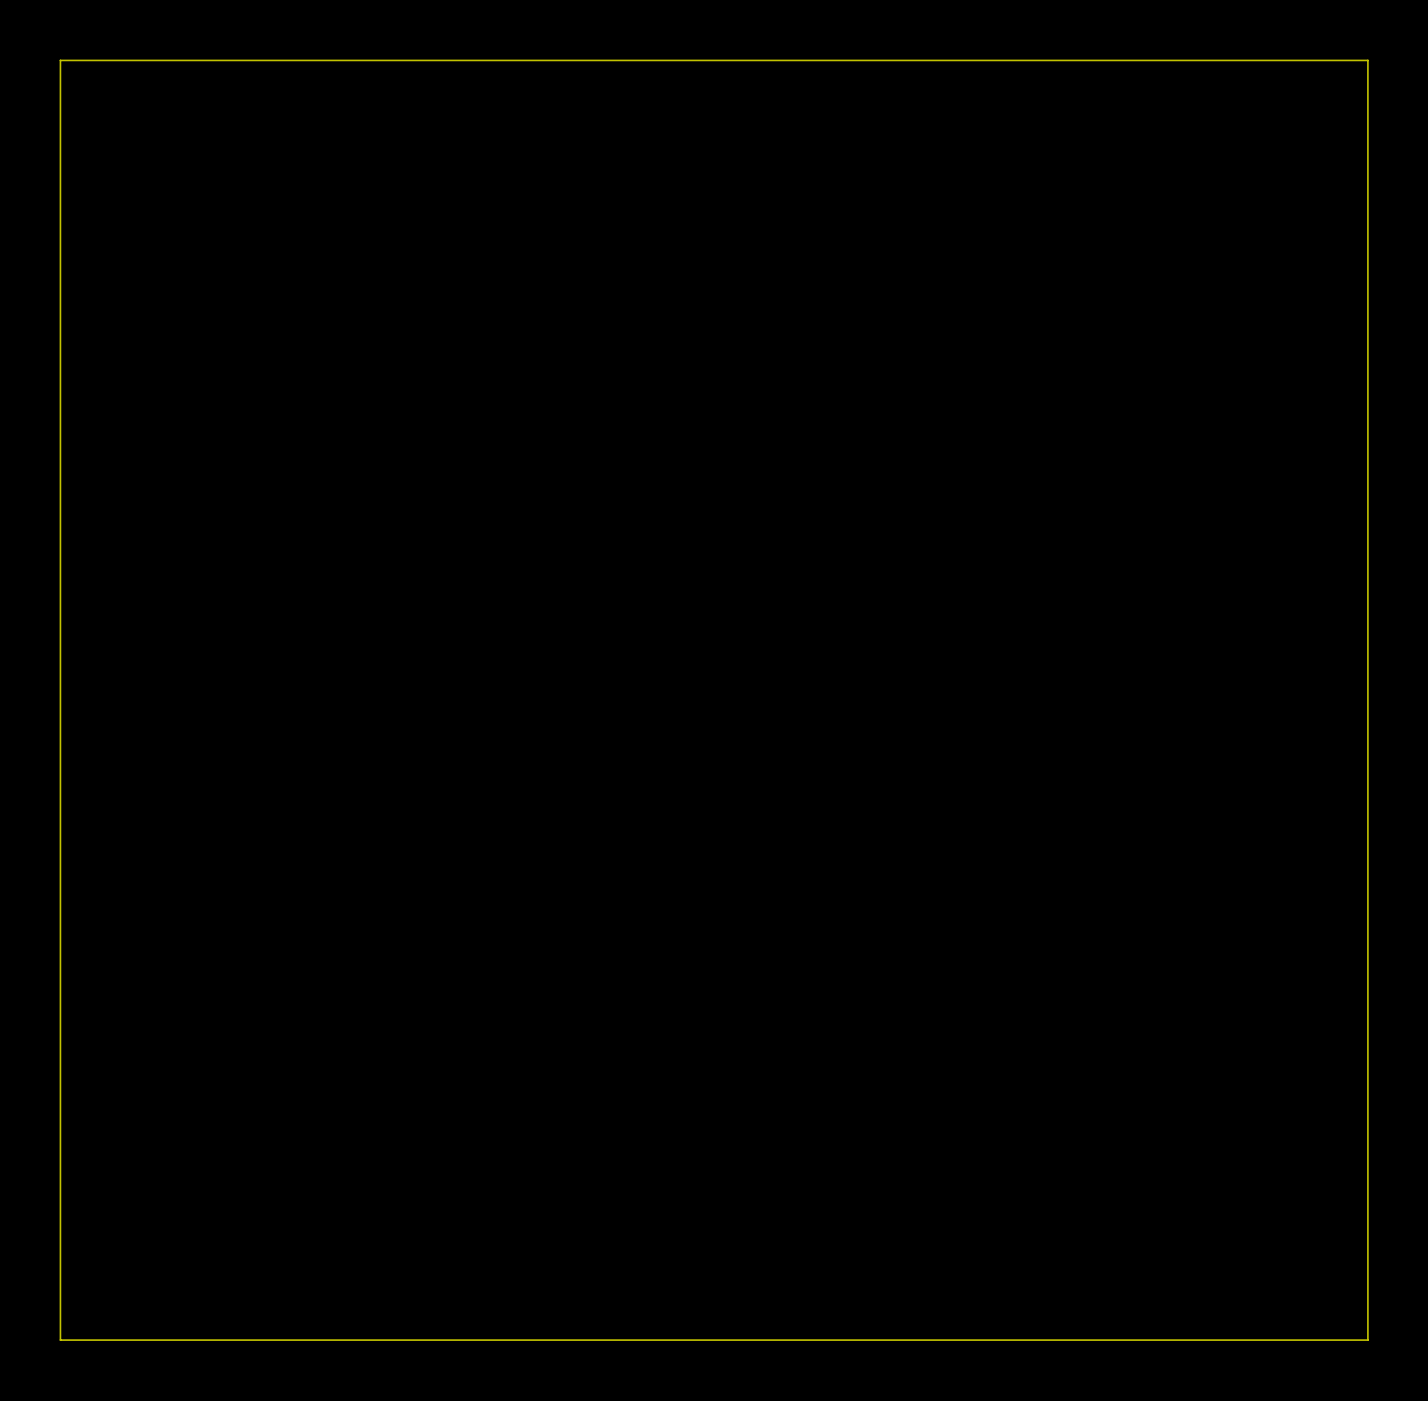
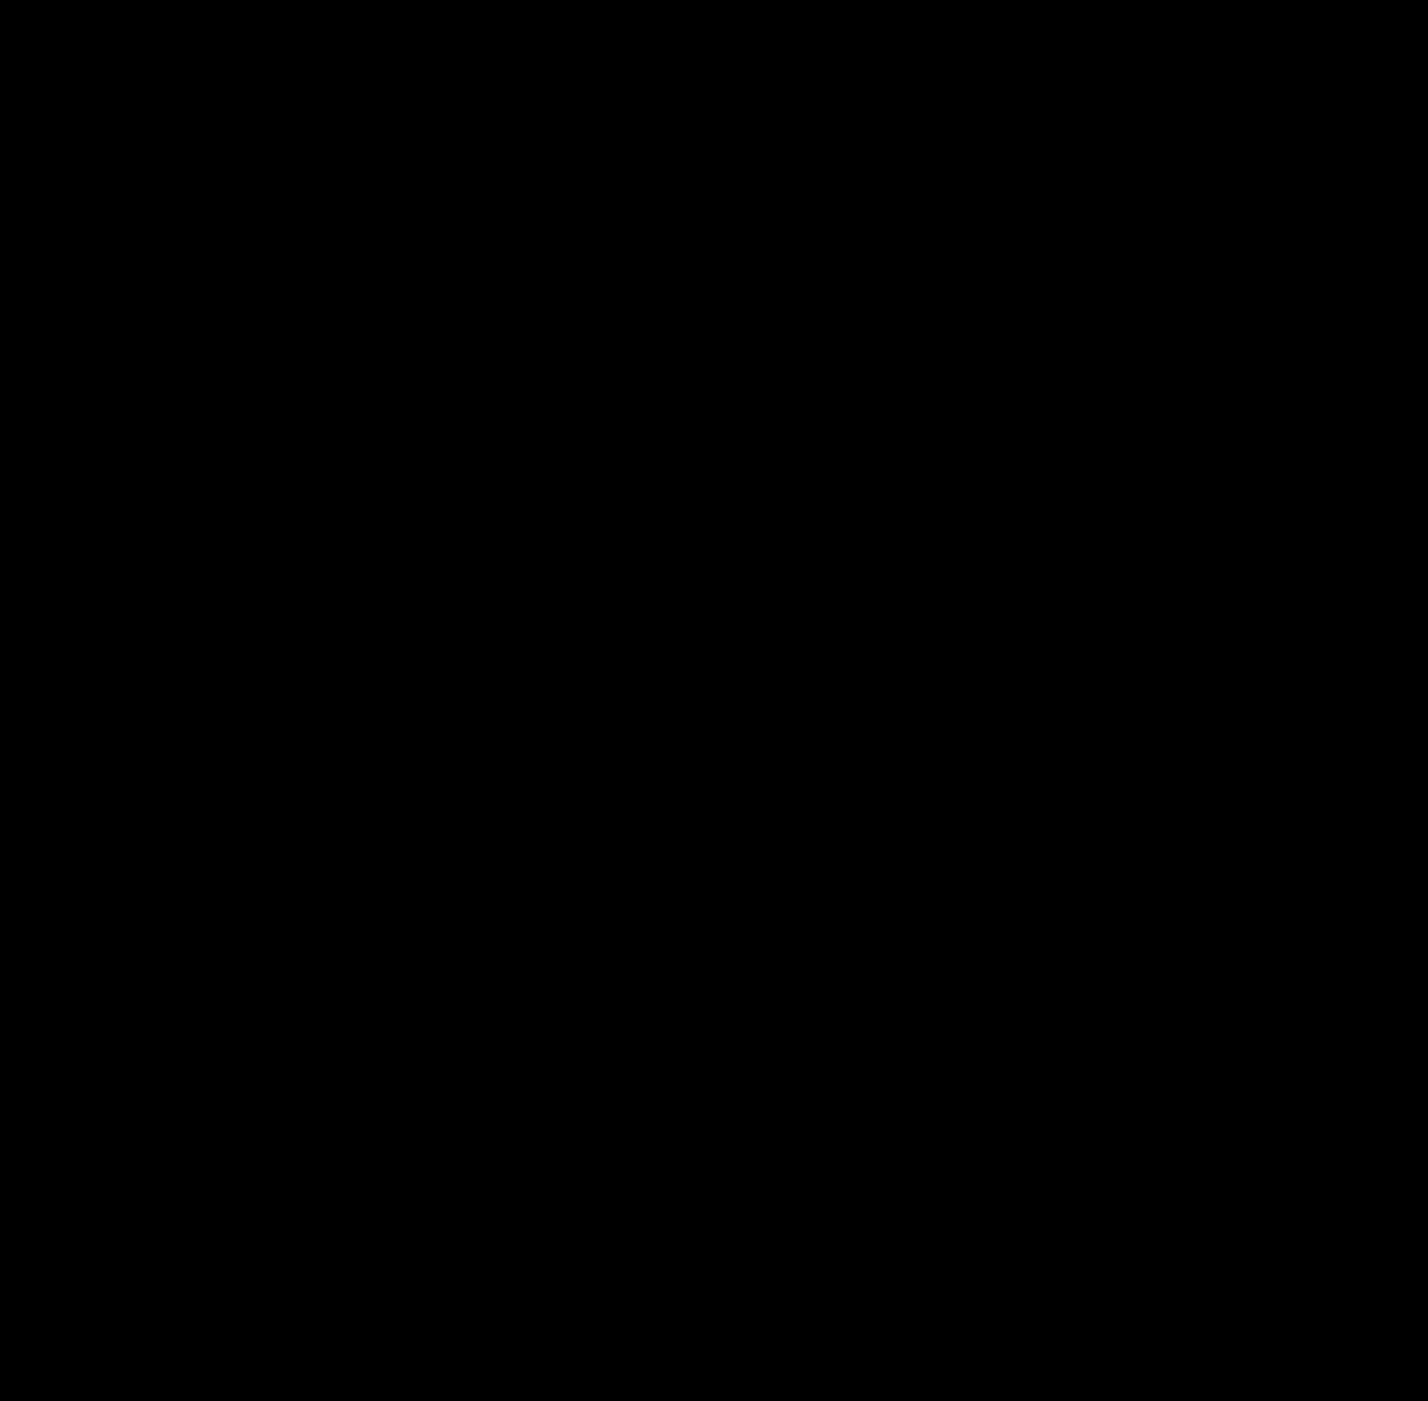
board edge: (1367, 60) (60, 60) (60, 1340) (1367, 1340) (1367, 60) -> none

